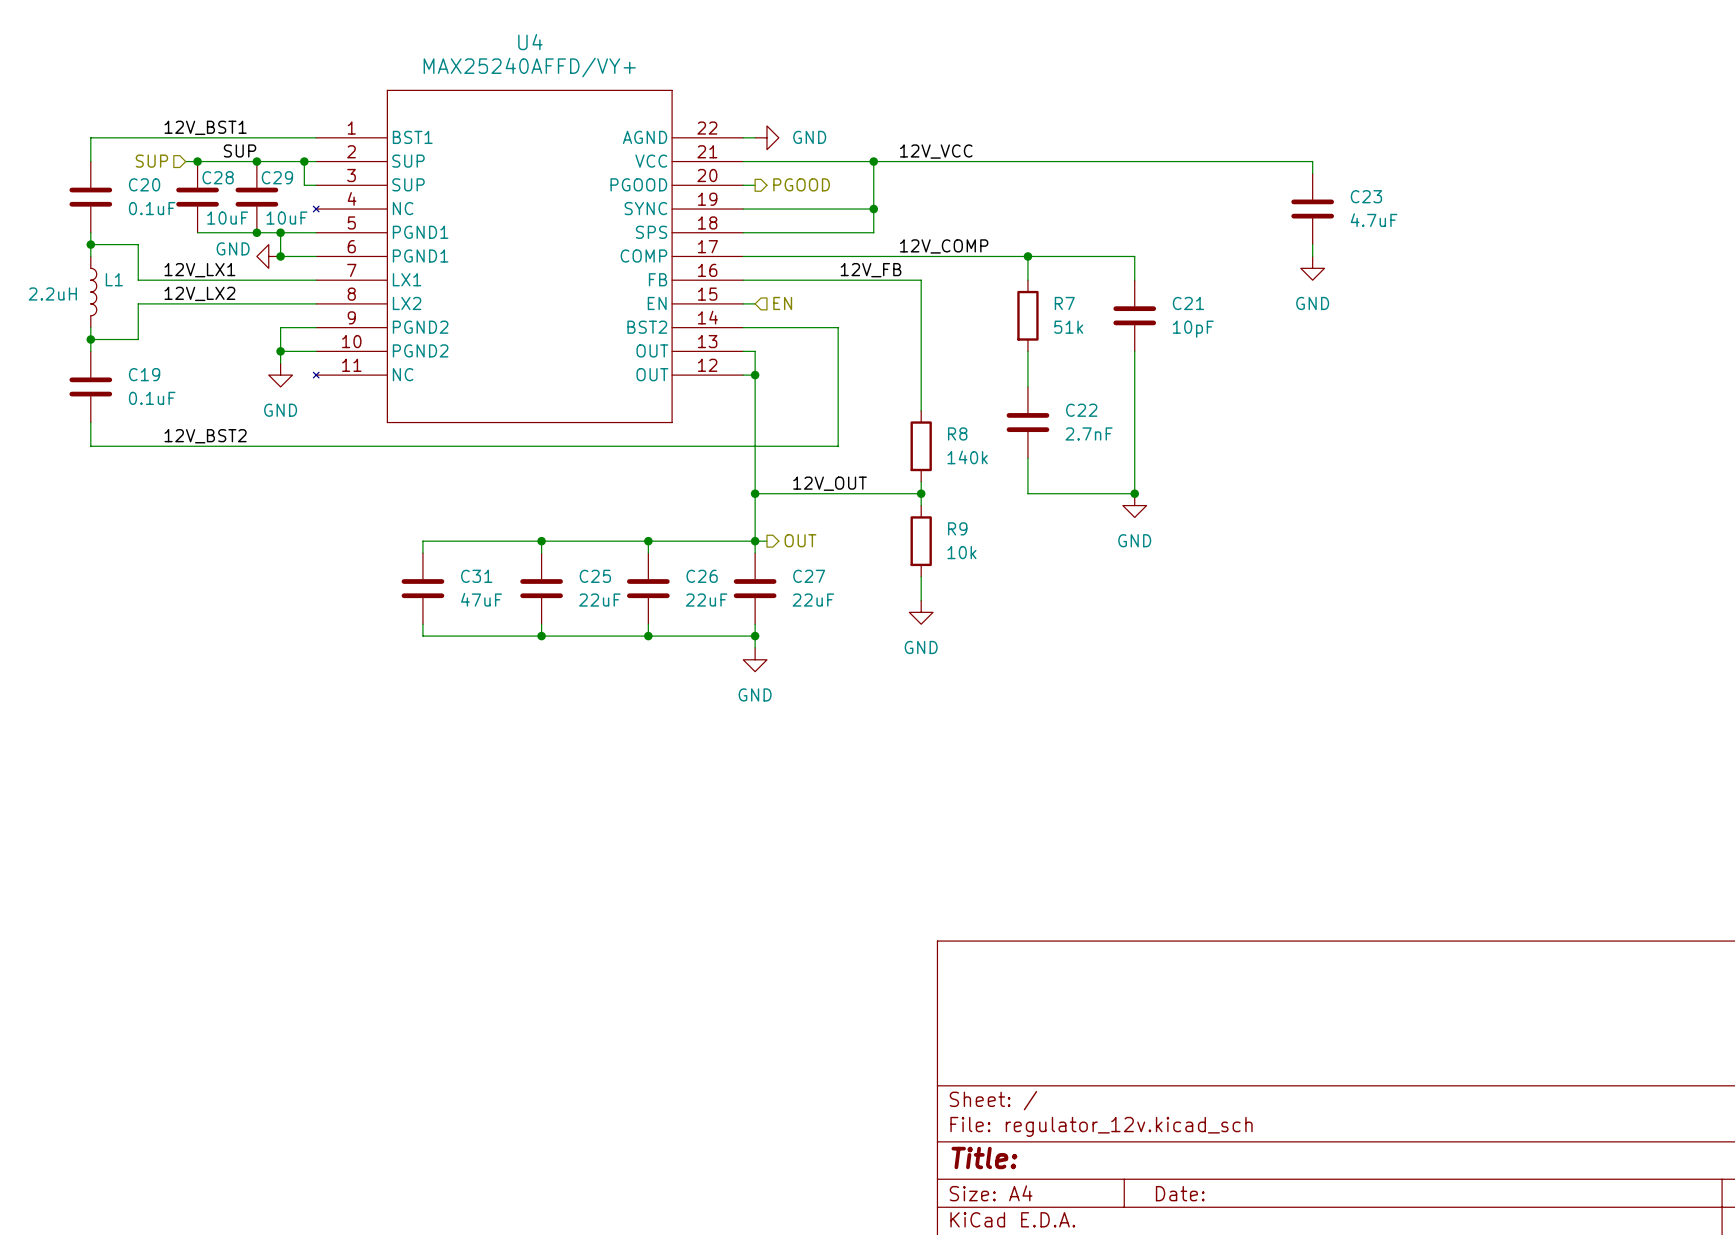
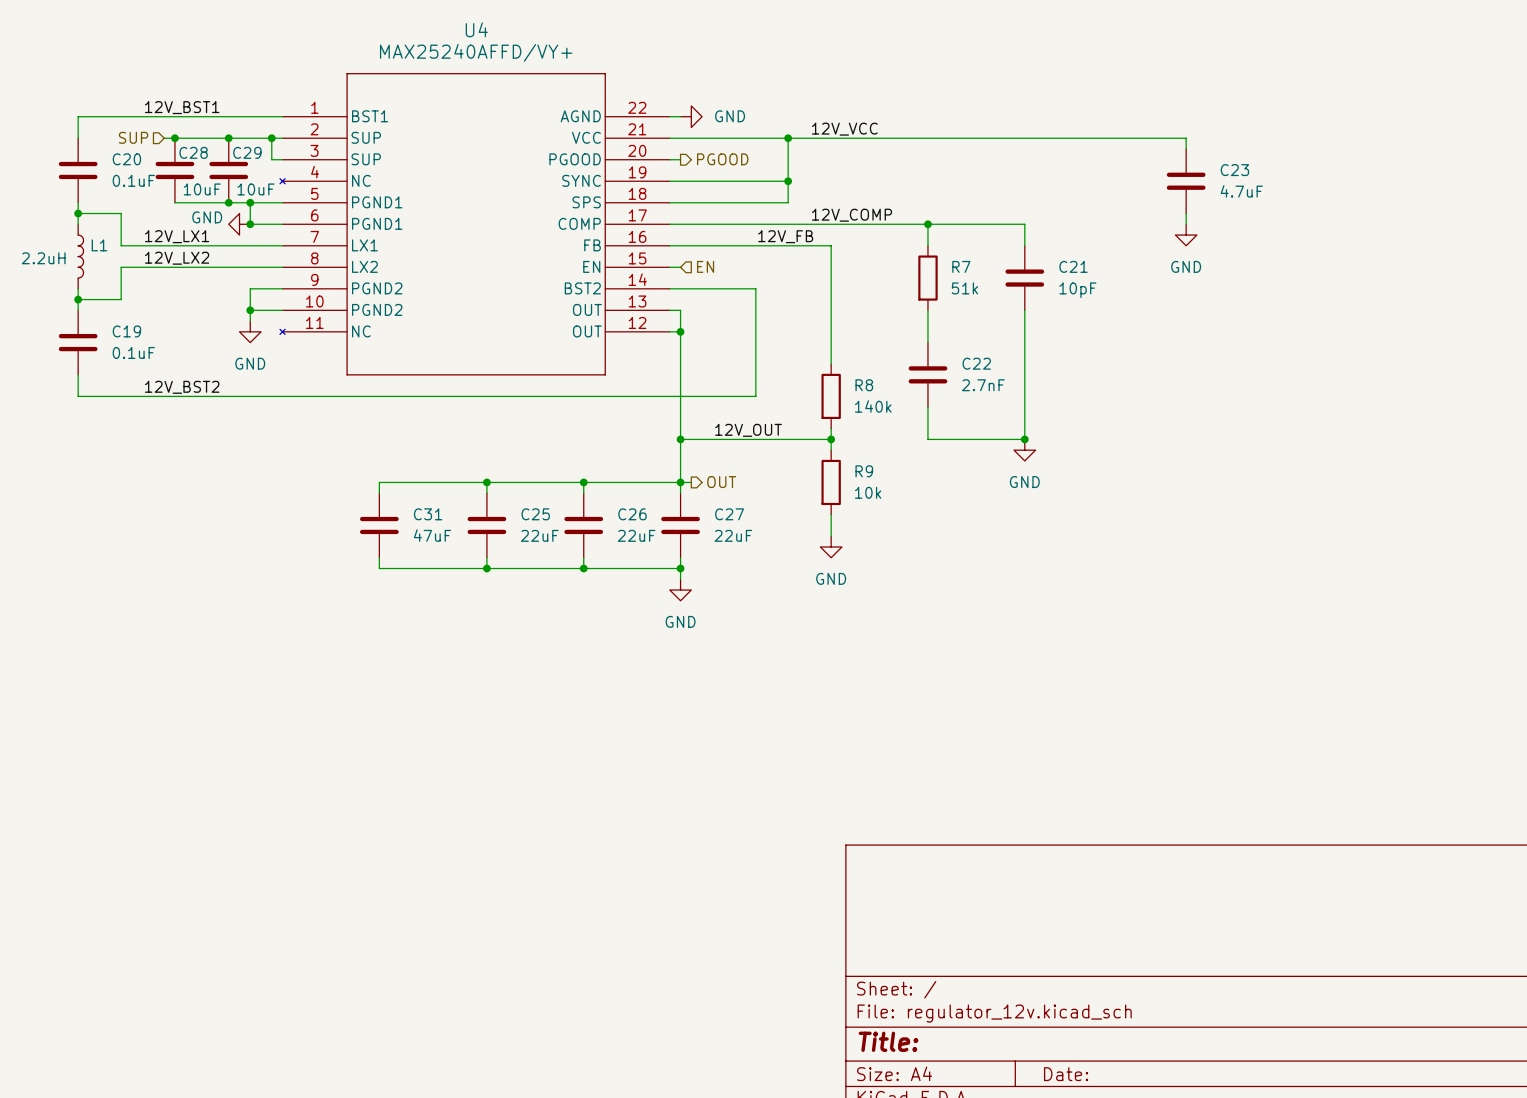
label: SUP (240, 150) -> none

